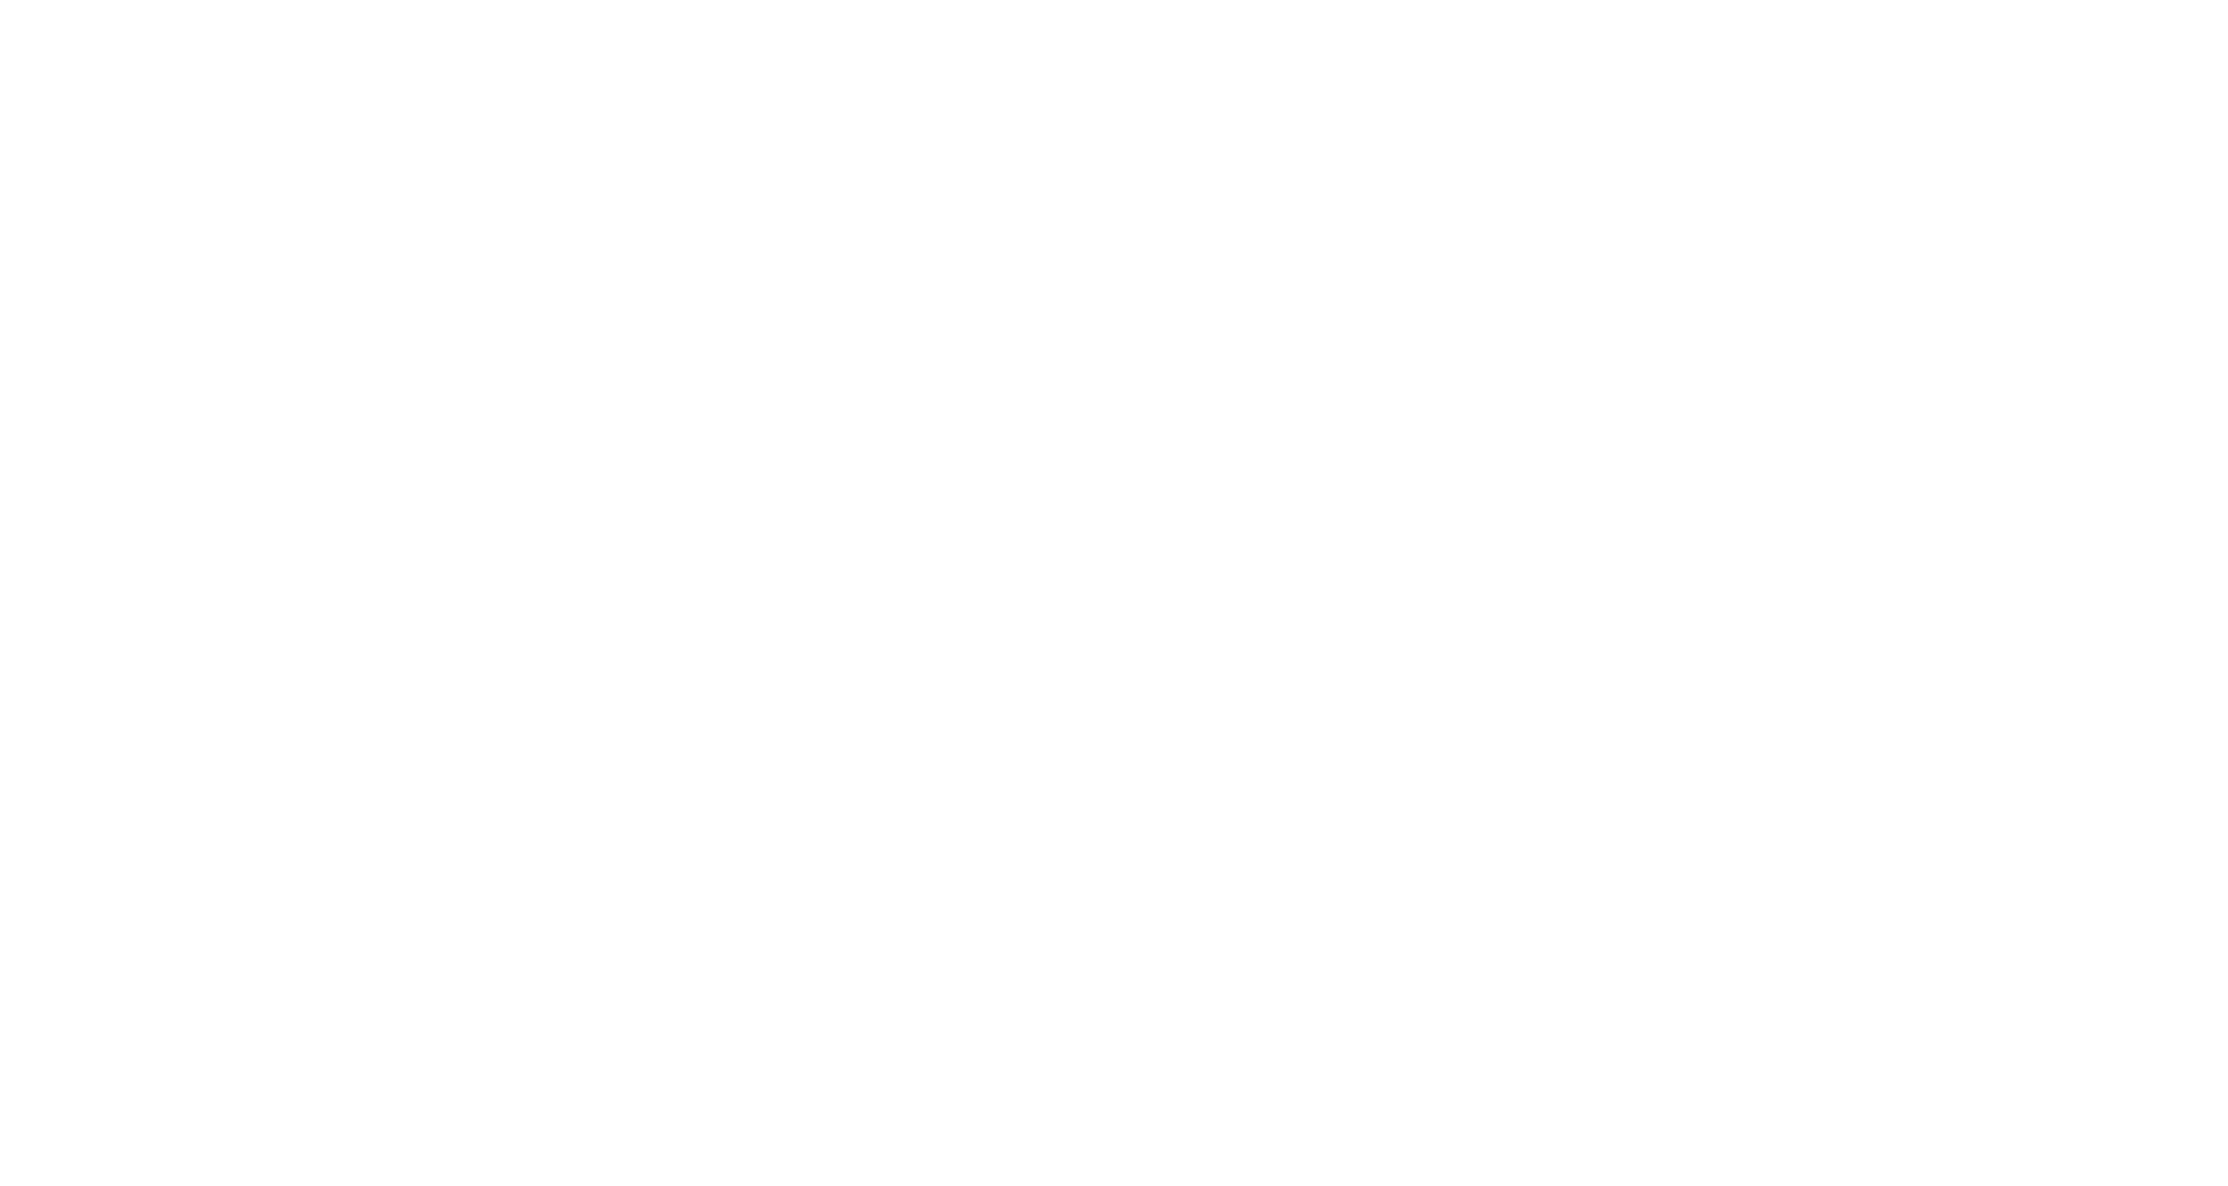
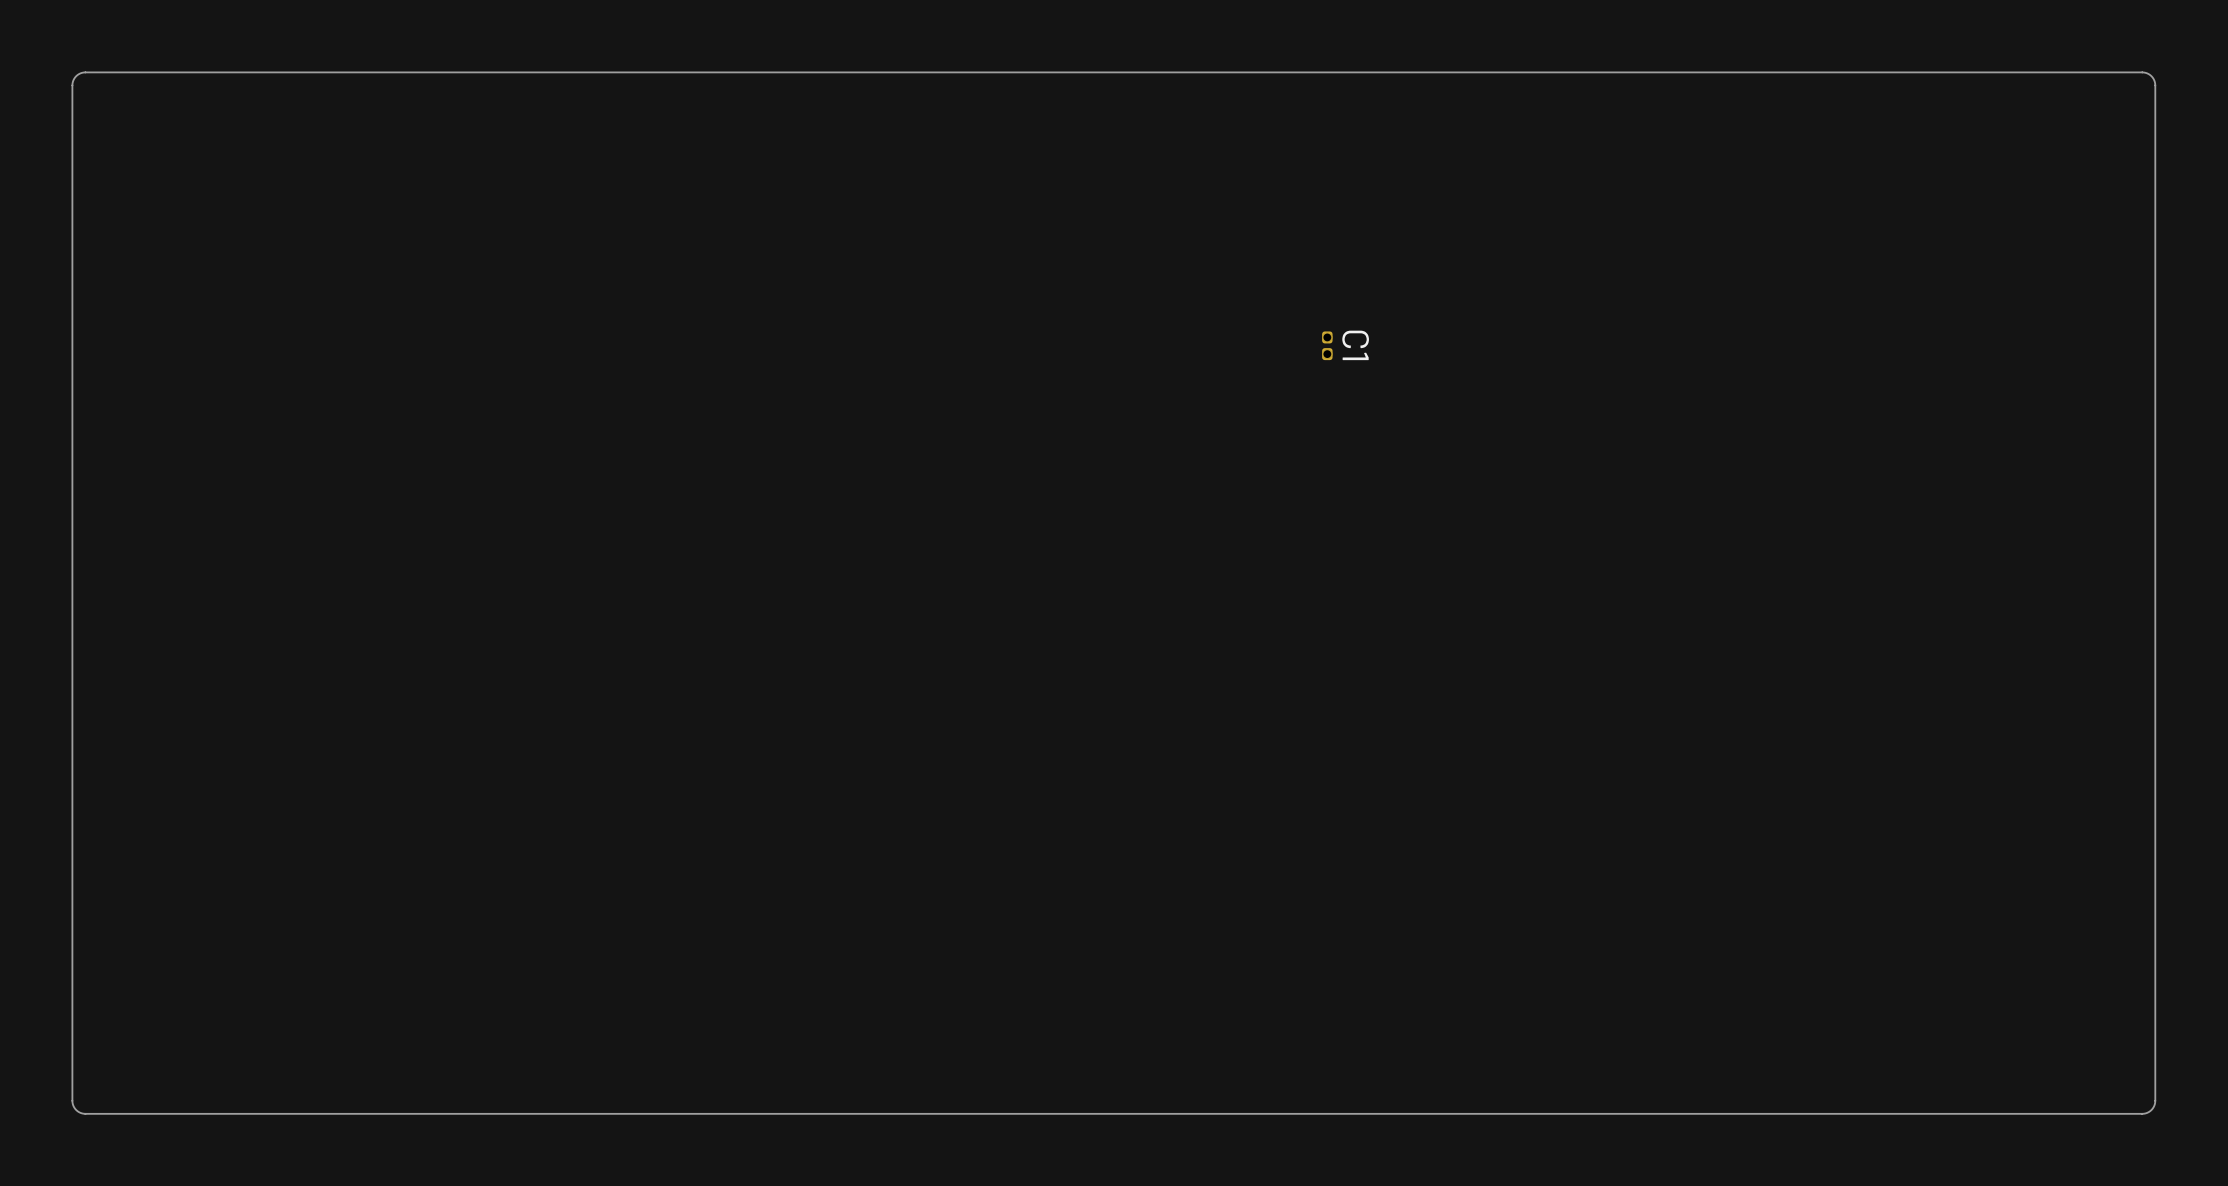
board edge: none -> (2142, 72) (85, 72) (78, 74) (74, 78) (72, 85) (72, 1100) (74, 1107) (78, 1112) (85, 1113) (2142, 1113) (2148, 1112) (2153, 1107) (2155, 1100) (2155, 85) (2151, 76) (2142, 72)
via: none -> (1327, 337)
C1: none -> (1327, 345)
via: none -> (1327, 354)

